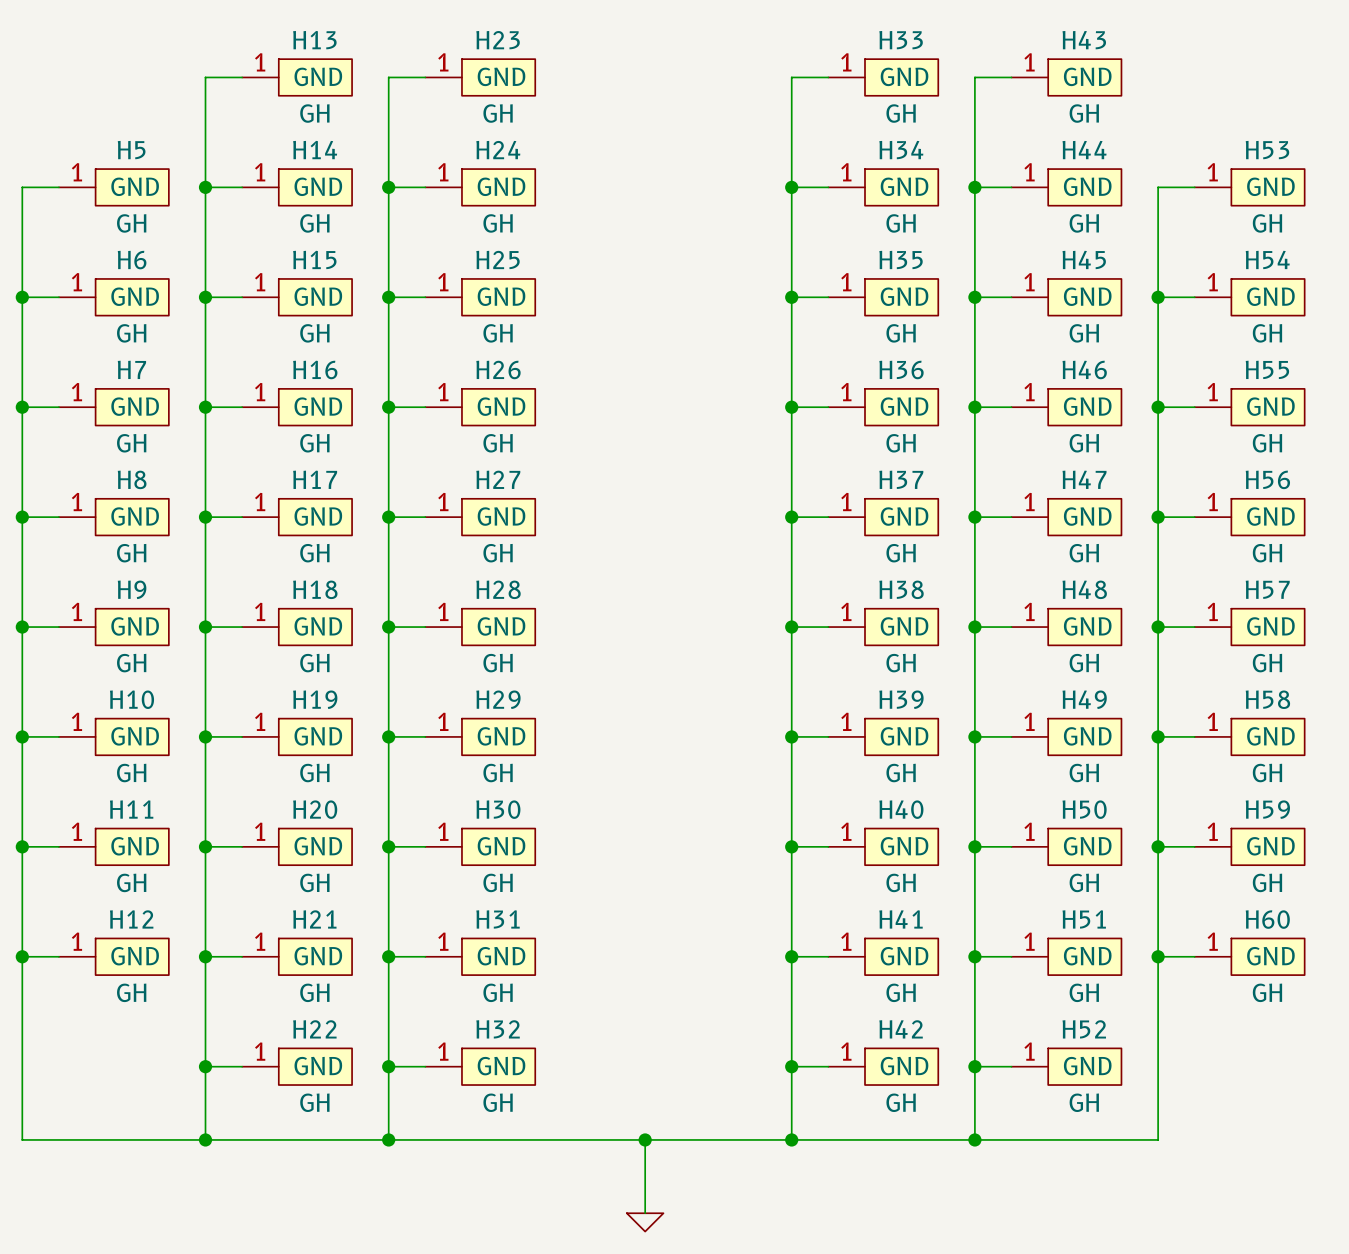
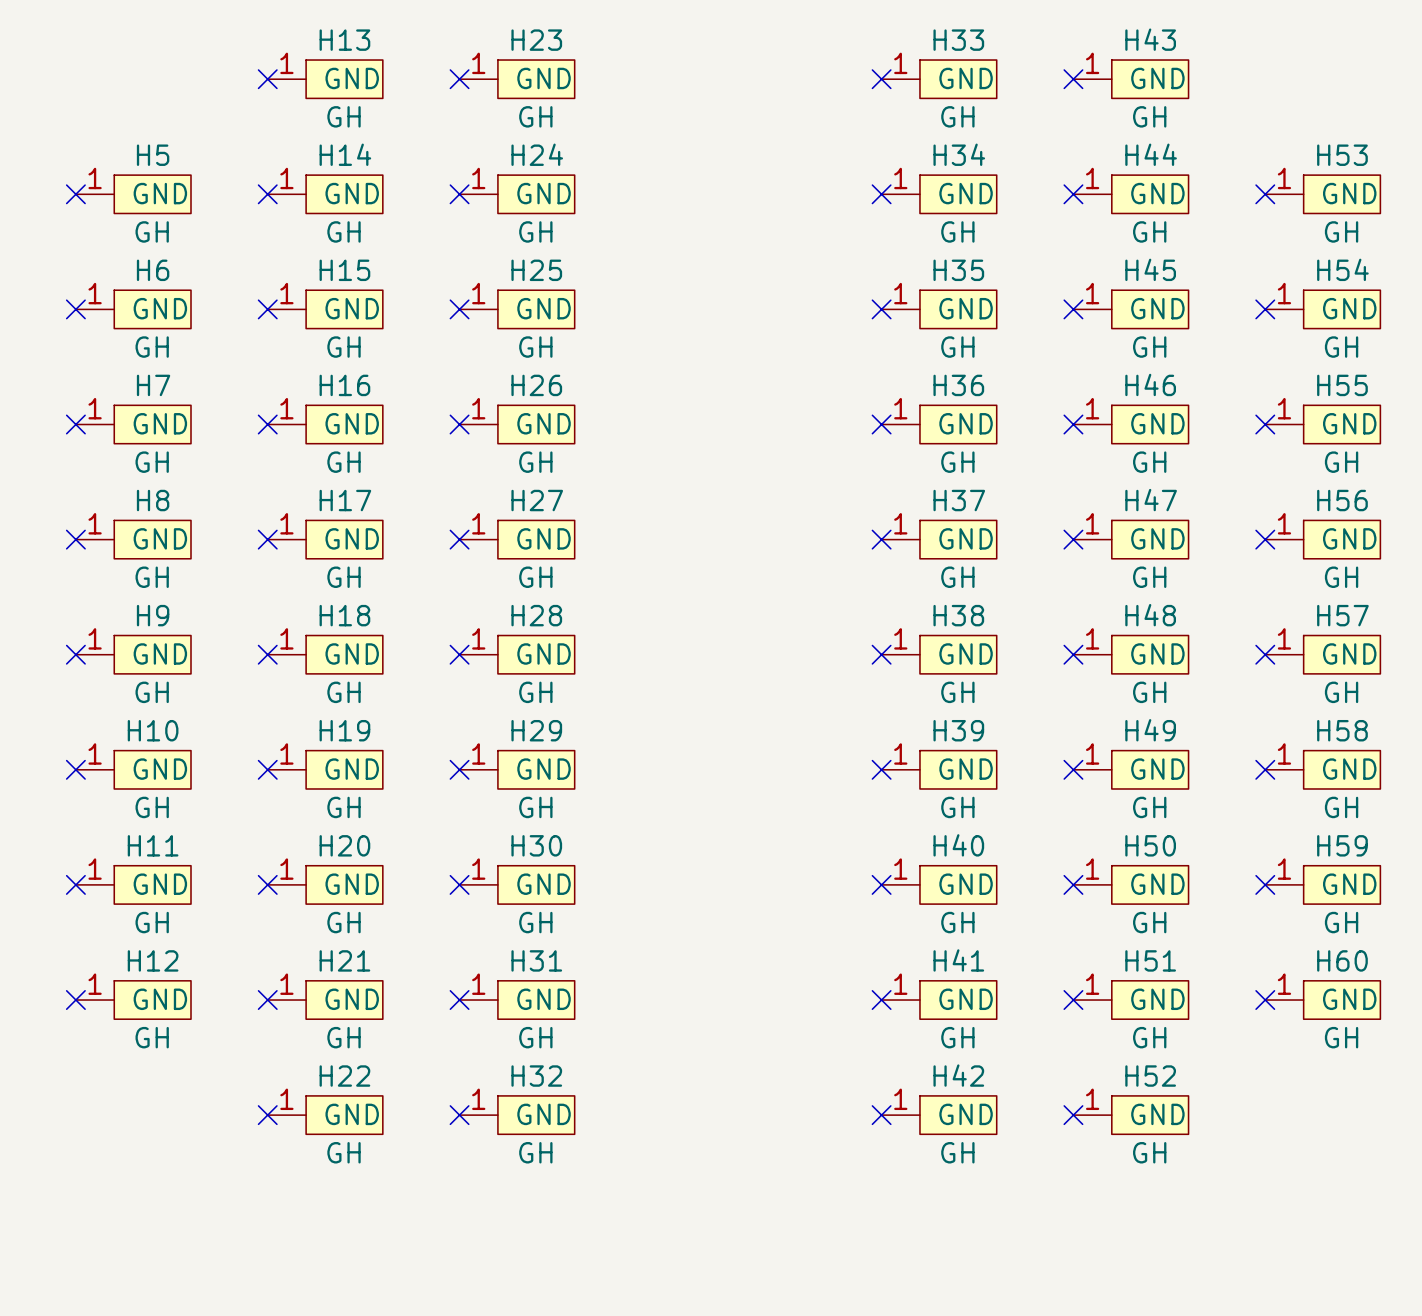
wire: (242, 77) (205, 77) (205, 1139) -> none
no-connect mark: none -> (267, 79)
wire: (425, 77) (388, 77) (388, 1139) -> none
no-connect mark: none -> (459, 79)
wire: (828, 77) (791, 77) (791, 1139) -> none
no-connect mark: none -> (881, 79)
wire: (1011, 77) (974, 77) (974, 1139) -> none
no-connect mark: none -> (1073, 79)
wire: (58, 187) (22, 187) (22, 1139) (1158, 1139) (1158, 187) (1194, 187) -> none
no-connect mark: none -> (75, 194)
wire: (205, 187) (242, 187) -> none
junction: (205, 187) -> none
no-connect mark: none -> (267, 194)
wire: (388, 187) (425, 187) -> none
junction: (388, 187) -> none
no-connect mark: none -> (459, 194)
wire: (791, 187) (828, 187) -> none
junction: (791, 187) -> none
no-connect mark: none -> (881, 194)
wire: (974, 187) (1011, 187) -> none
junction: (974, 187) -> none
no-connect mark: none -> (1073, 194)
no-connect mark: none -> (1265, 194)
wire: (22, 297) (58, 297) -> none
junction: (22, 297) -> none
no-connect mark: none -> (75, 309)
wire: (205, 297) (242, 297) -> none
junction: (205, 297) -> none
no-connect mark: none -> (267, 309)
wire: (388, 297) (425, 297) -> none
junction: (388, 297) -> none
no-connect mark: none -> (459, 309)
wire: (791, 297) (828, 297) -> none
junction: (791, 297) -> none
no-connect mark: none -> (881, 309)
wire: (974, 297) (1011, 297) -> none
junction: (974, 297) -> none
no-connect mark: none -> (1073, 309)
wire: (1158, 297) (1194, 297) -> none
junction: (1158, 297) -> none
no-connect mark: none -> (1265, 309)
wire: (22, 407) (58, 407) -> none
junction: (22, 407) -> none
no-connect mark: none -> (75, 424)
wire: (205, 407) (242, 407) -> none
junction: (205, 407) -> none
no-connect mark: none -> (267, 424)
wire: (388, 407) (425, 407) -> none
junction: (388, 407) -> none
no-connect mark: none -> (459, 424)
wire: (791, 407) (828, 407) -> none
junction: (791, 407) -> none
no-connect mark: none -> (881, 424)
wire: (974, 407) (1011, 407) -> none
junction: (974, 407) -> none
no-connect mark: none -> (1073, 424)
wire: (1158, 407) (1194, 407) -> none
junction: (1158, 407) -> none
no-connect mark: none -> (1265, 424)
wire: (22, 517) (58, 517) -> none
junction: (22, 517) -> none
no-connect mark: none -> (75, 539)
wire: (205, 517) (242, 517) -> none
junction: (205, 517) -> none
no-connect mark: none -> (267, 539)
wire: (388, 517) (425, 517) -> none
junction: (388, 517) -> none
no-connect mark: none -> (459, 539)
wire: (791, 517) (828, 517) -> none
junction: (791, 517) -> none
no-connect mark: none -> (881, 539)
wire: (974, 517) (1011, 517) -> none
junction: (974, 517) -> none
no-connect mark: none -> (1073, 539)
wire: (1158, 517) (1194, 517) -> none
junction: (1158, 517) -> none
no-connect mark: none -> (1265, 539)
wire: (22, 627) (58, 627) -> none
junction: (22, 627) -> none
no-connect mark: none -> (75, 654)
wire: (205, 627) (242, 627) -> none
junction: (205, 627) -> none
no-connect mark: none -> (267, 654)
wire: (388, 627) (425, 627) -> none
junction: (388, 627) -> none
no-connect mark: none -> (459, 654)
wire: (791, 627) (828, 627) -> none
junction: (791, 627) -> none
no-connect mark: none -> (881, 654)
wire: (974, 627) (1011, 627) -> none
junction: (974, 627) -> none
no-connect mark: none -> (1073, 654)
wire: (1158, 627) (1194, 627) -> none
junction: (1158, 627) -> none
no-connect mark: none -> (1265, 654)
wire: (22, 736) (58, 736) -> none
junction: (22, 736) -> none
no-connect mark: none -> (75, 769)
wire: (205, 736) (242, 736) -> none
junction: (205, 736) -> none
no-connect mark: none -> (267, 769)
wire: (388, 736) (425, 736) -> none
junction: (388, 736) -> none
no-connect mark: none -> (459, 769)
wire: (791, 736) (828, 736) -> none
junction: (791, 736) -> none
no-connect mark: none -> (881, 769)
wire: (974, 736) (1011, 736) -> none
junction: (974, 736) -> none
no-connect mark: none -> (1073, 769)
wire: (1158, 736) (1194, 736) -> none
junction: (1158, 736) -> none
no-connect mark: none -> (1265, 769)
wire: (22, 846) (58, 846) -> none
junction: (22, 846) -> none
no-connect mark: none -> (75, 884)
wire: (205, 846) (242, 846) -> none
junction: (205, 846) -> none
no-connect mark: none -> (267, 884)
wire: (388, 846) (425, 846) -> none
junction: (388, 846) -> none
no-connect mark: none -> (459, 884)
wire: (791, 846) (828, 846) -> none
junction: (791, 846) -> none
no-connect mark: none -> (881, 884)
wire: (974, 846) (1011, 846) -> none
junction: (974, 846) -> none
no-connect mark: none -> (1073, 884)
wire: (1158, 846) (1194, 846) -> none
junction: (1158, 846) -> none
no-connect mark: none -> (1265, 884)
wire: (22, 956) (58, 956) -> none
junction: (22, 956) -> none
no-connect mark: none -> (75, 1000)
wire: (205, 956) (242, 956) -> none
junction: (205, 956) -> none
no-connect mark: none -> (267, 1000)
wire: (388, 956) (425, 956) -> none
junction: (388, 956) -> none
no-connect mark: none -> (459, 1000)
wire: (791, 956) (828, 956) -> none
junction: (791, 956) -> none
no-connect mark: none -> (881, 1000)
wire: (974, 956) (1011, 956) -> none
junction: (974, 956) -> none
no-connect mark: none -> (1073, 1000)
wire: (1158, 956) (1194, 956) -> none
junction: (1158, 956) -> none
no-connect mark: none -> (1265, 1000)
wire: (205, 1066) (242, 1066) -> none
junction: (205, 1066) -> none
no-connect mark: none -> (267, 1115)
wire: (388, 1066) (425, 1066) -> none
junction: (388, 1066) -> none
no-connect mark: none -> (459, 1115)
wire: (791, 1066) (828, 1066) -> none
junction: (791, 1066) -> none
no-connect mark: none -> (881, 1115)
wire: (974, 1066) (1011, 1066) -> none
junction: (974, 1066) -> none
no-connect mark: none -> (1073, 1115)
junction: (205, 1139) -> none
junction: (388, 1139) -> none
wire: (645, 1139) (645, 1213) -> none
junction: (645, 1139) -> none
junction: (791, 1139) -> none
junction: (974, 1139) -> none
power symbol: (645, 1222) -> none

